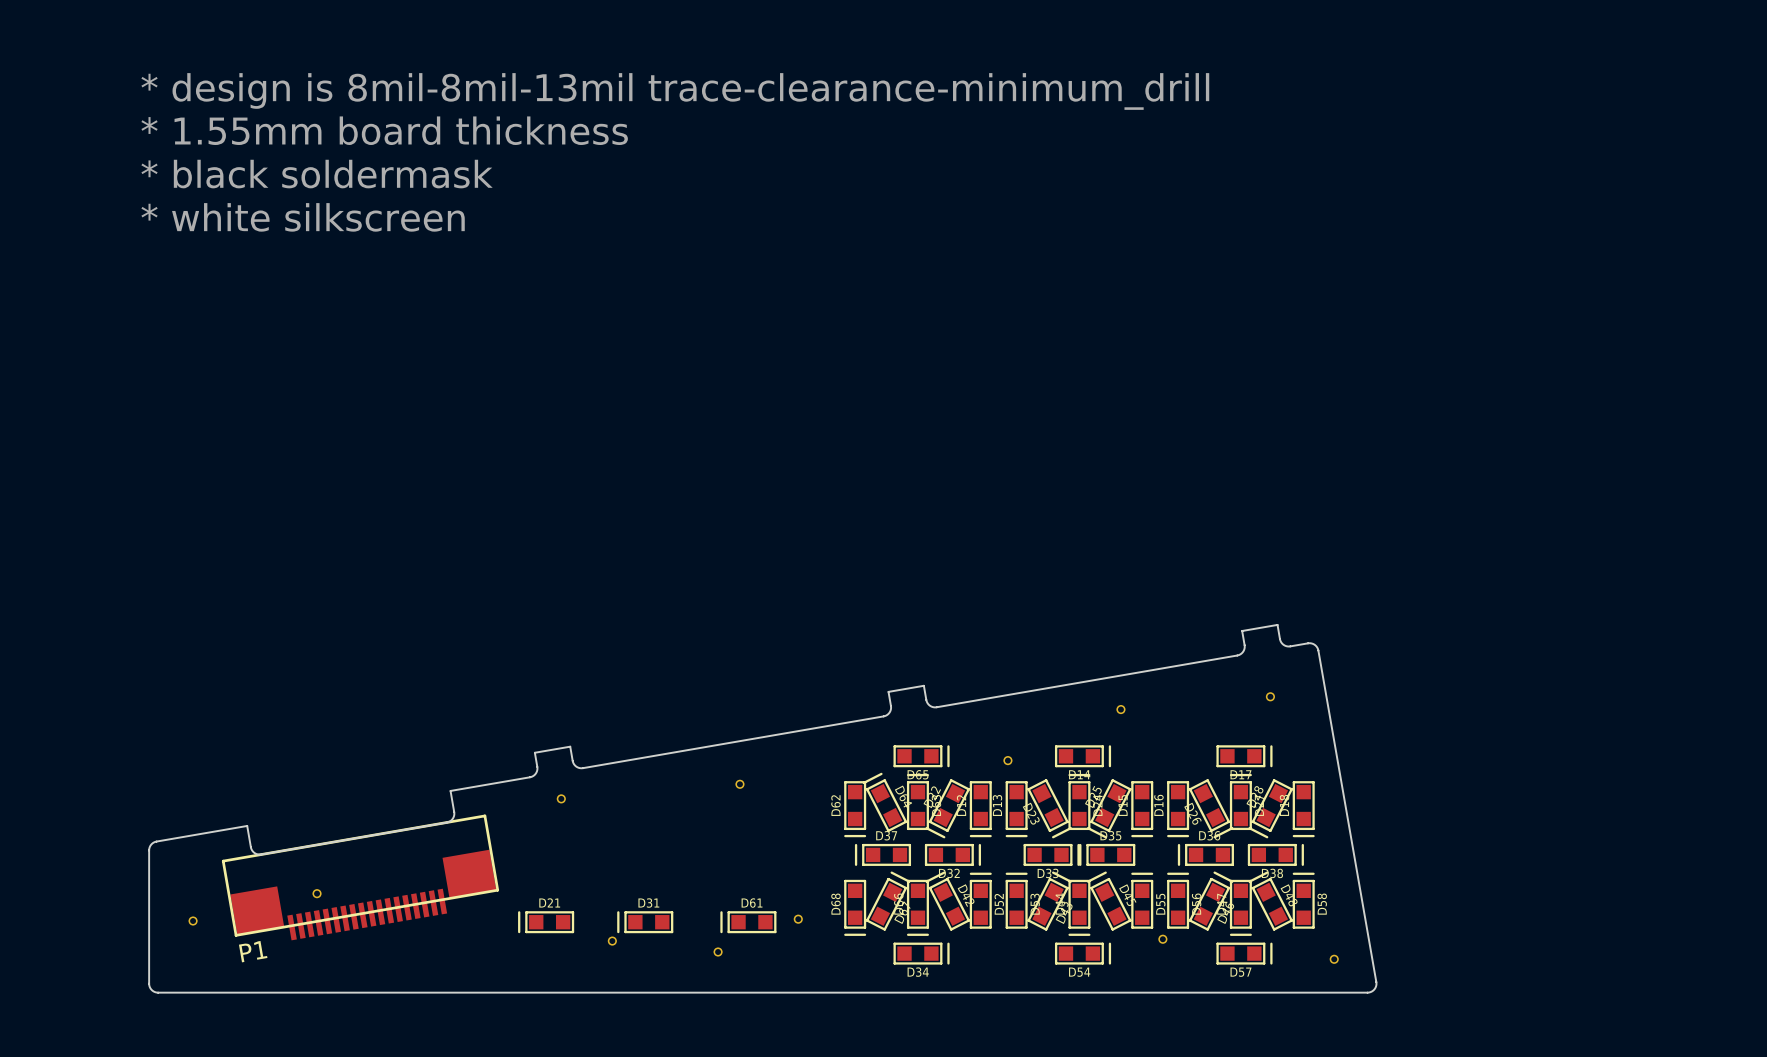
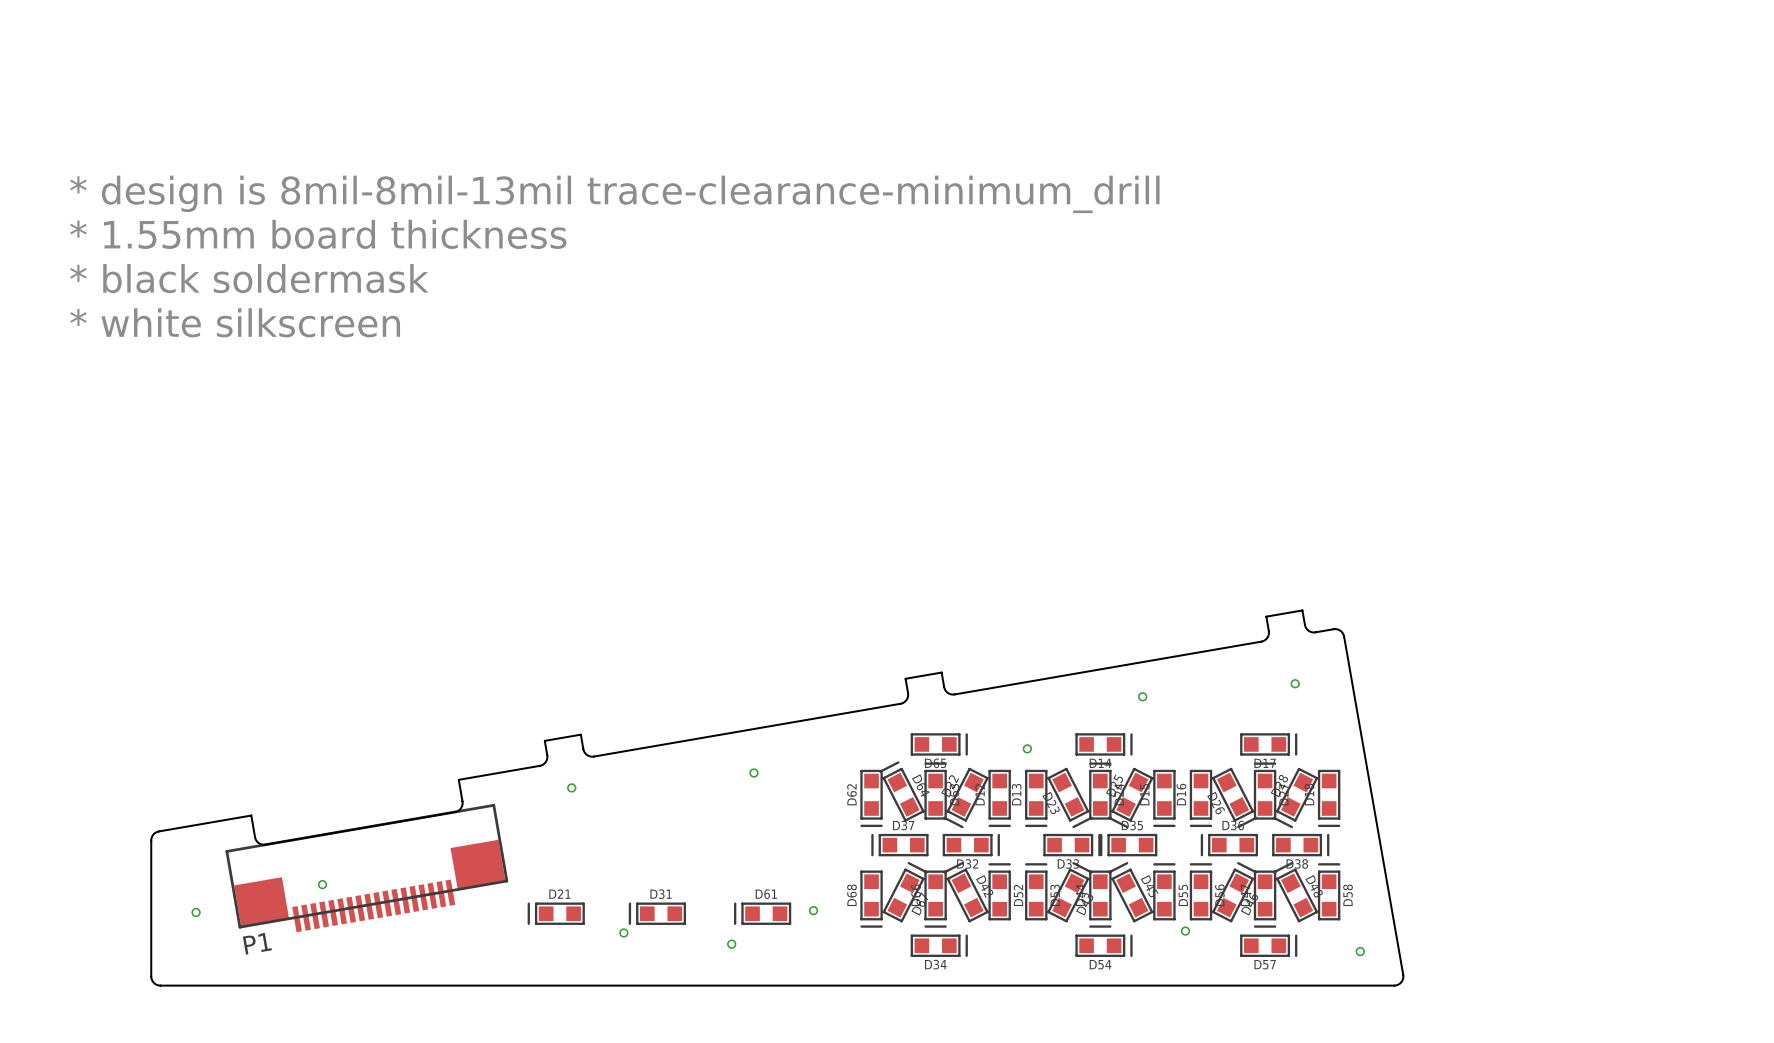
text position: * design is 8mil-8mil-13mil trace-clearance-minimum_drill (675, 91) -> * design is 8mil-8mil-13mil trace-clearance-minimum_drill (614, 194)
text position: * 1.55mm board thickness (384, 130) -> * 1.55mm board thickness (318, 234)
text position: * black soldermask (317, 174) -> * black soldermask (249, 278)
text position: * white silkscreen (303, 217) -> * white silkscreen (235, 322)

